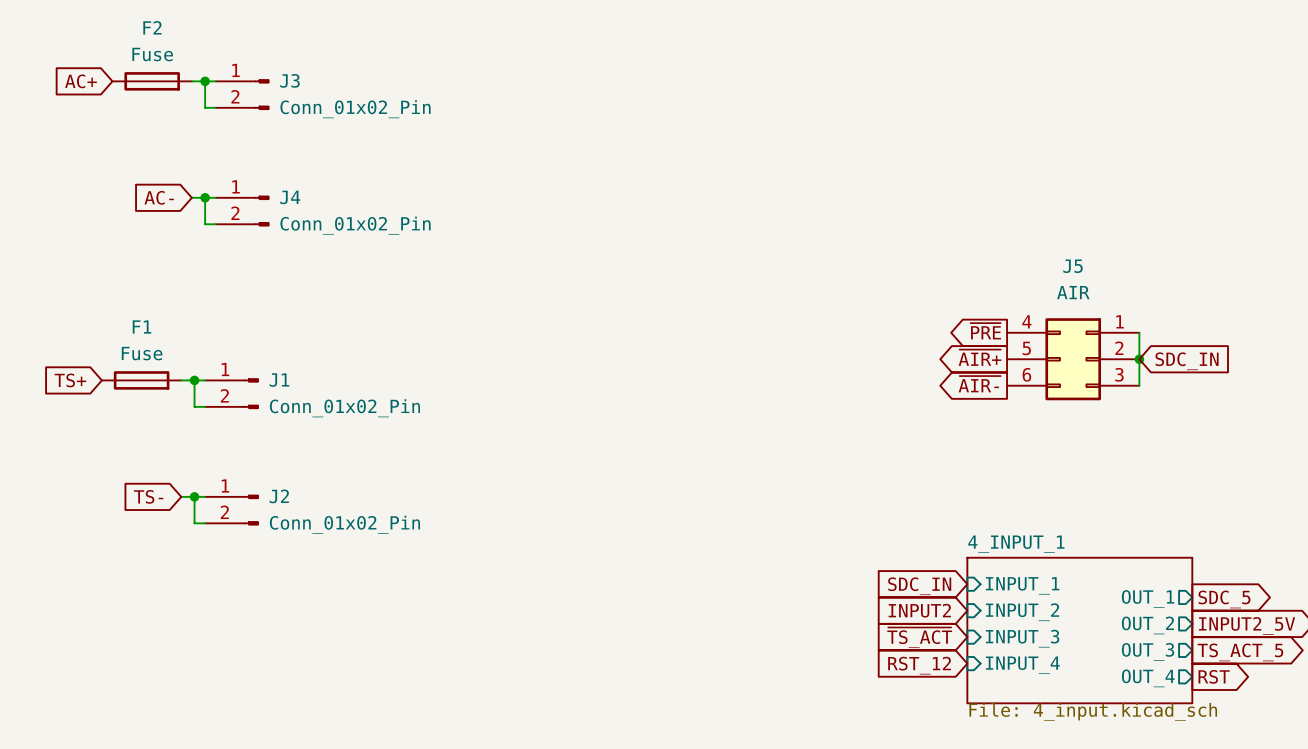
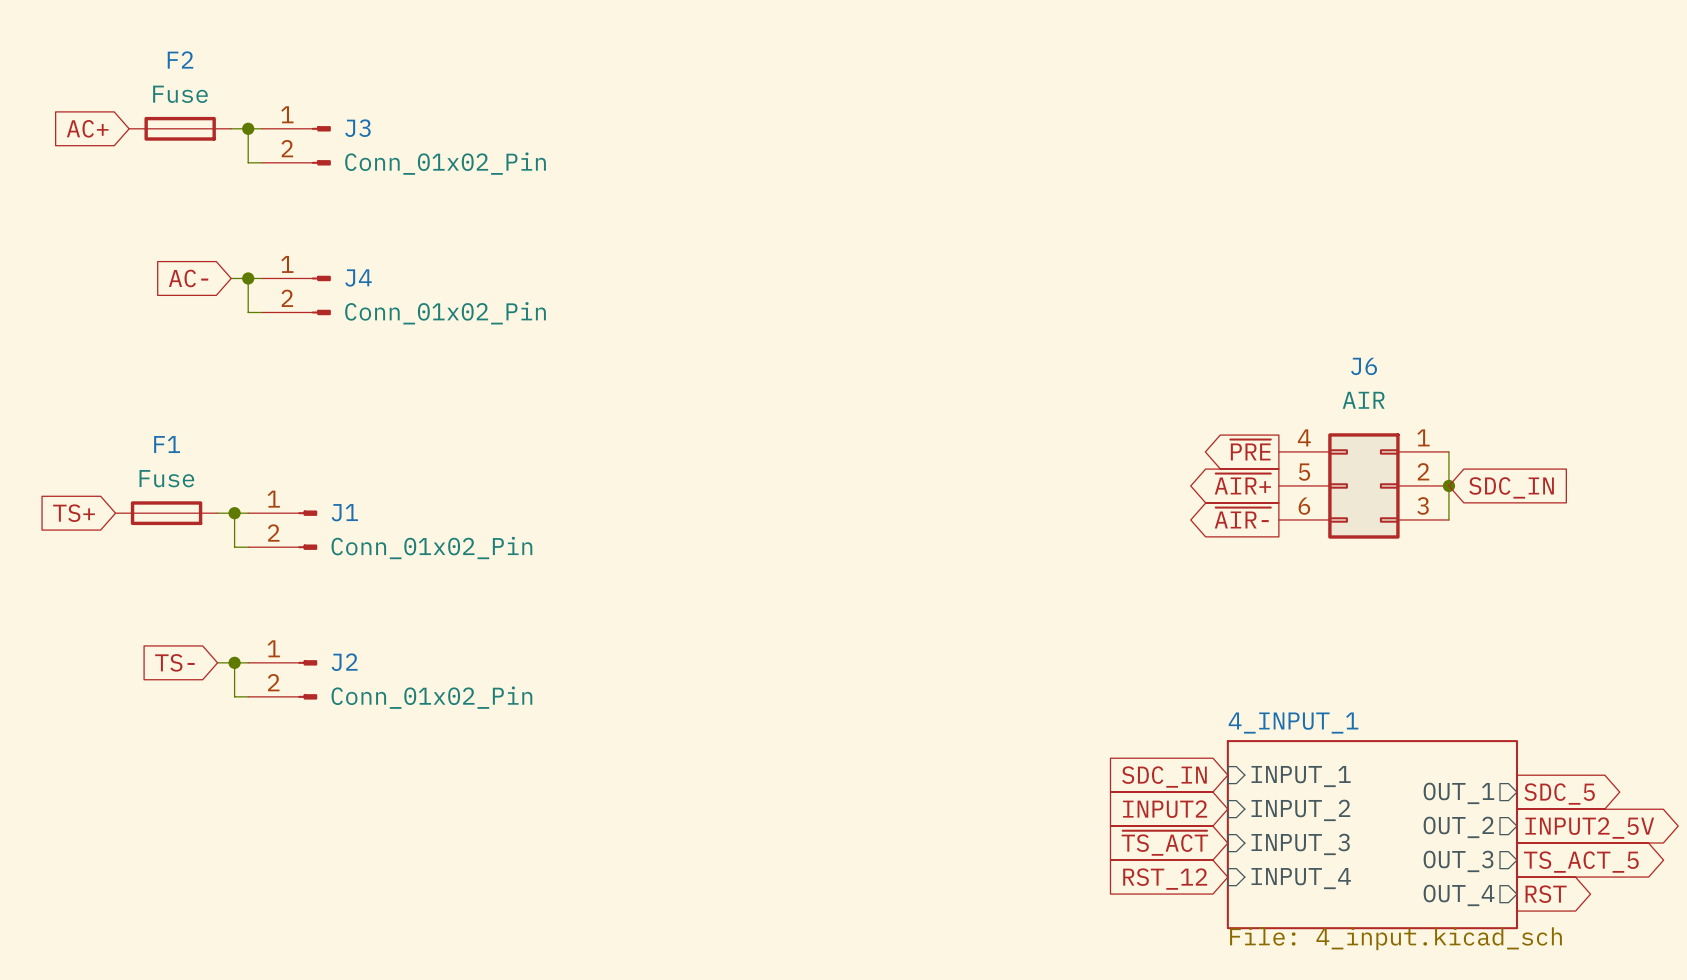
J5 name: J5 (1072, 266) -> J6 (1364, 366)

